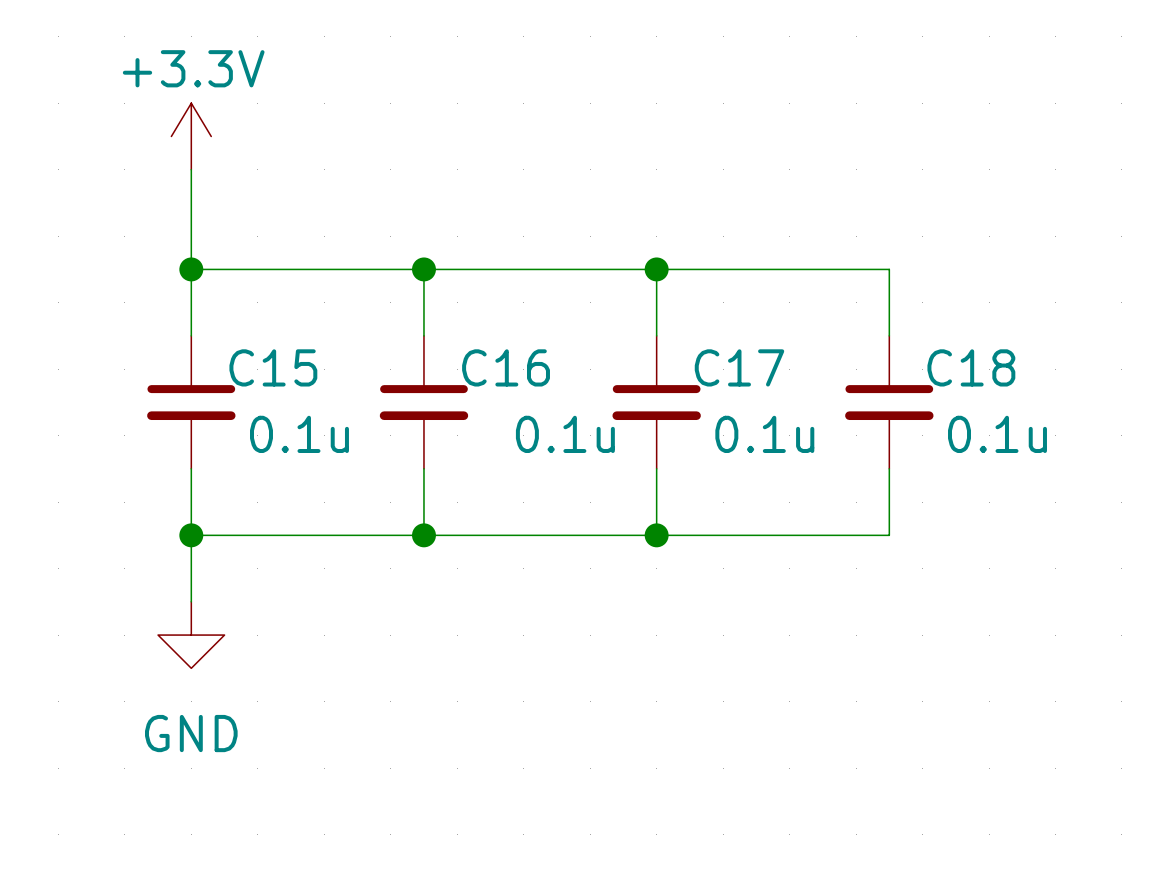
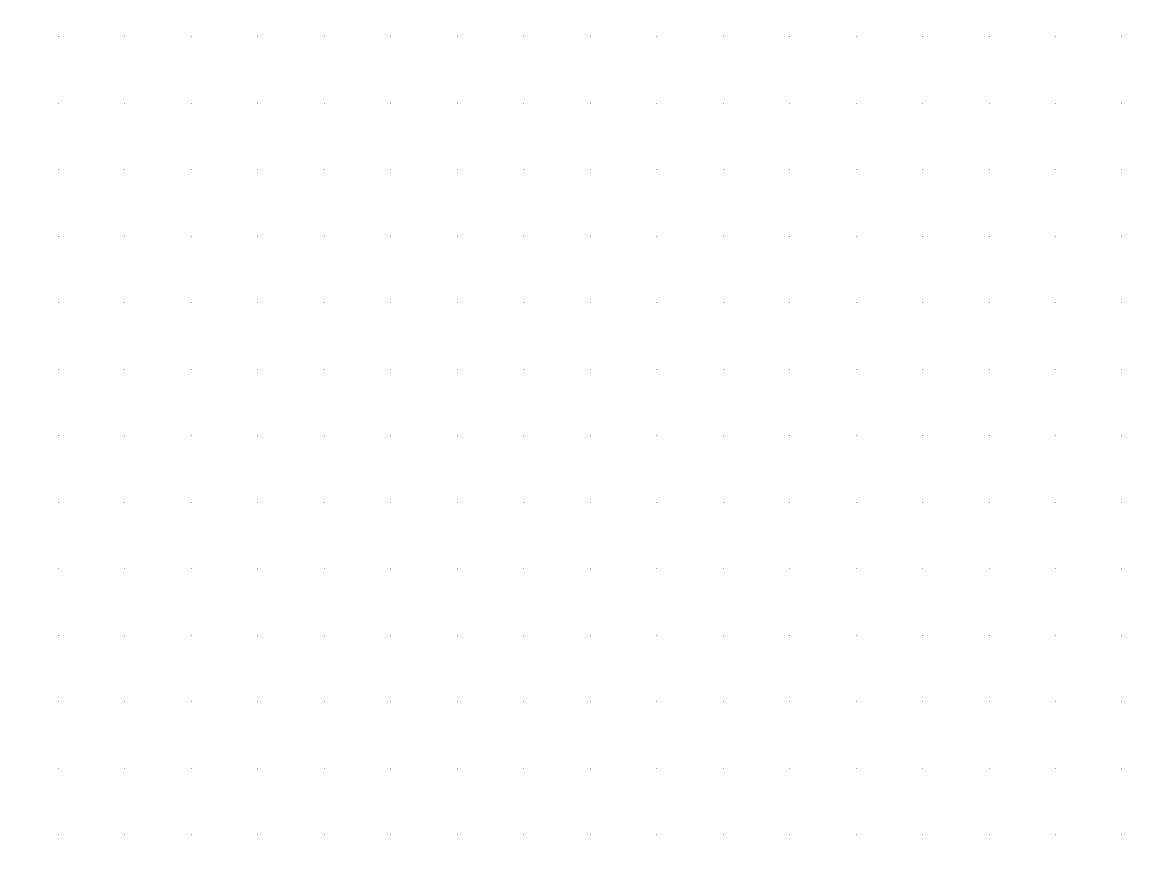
power symbol: +3.3V (191, 136) -> none
wire: (191, 169) (191, 335) -> none
wire: (191, 269) (889, 269) (889, 335) -> none
junction: (191, 269) -> none
wire: (423, 269) (423, 335) -> none
junction: (423, 269) -> none
wire: (656, 269) (656, 335) -> none
junction: (656, 269) -> none
C15: 0.1u (191, 402) -> none
C16: 0.1u (423, 402) -> none
C17: 0.1u (656, 402) -> none
C18: 0.1u (889, 402) -> none
wire: (191, 468) (191, 601) -> none
wire: (423, 468) (423, 535) -> none
wire: (656, 468) (656, 535) -> none
wire: (889, 468) (889, 535) (191, 535) -> none
junction: (191, 535) -> none
junction: (423, 535) -> none
junction: (656, 535) -> none
power symbol: GND (191, 635) -> none

